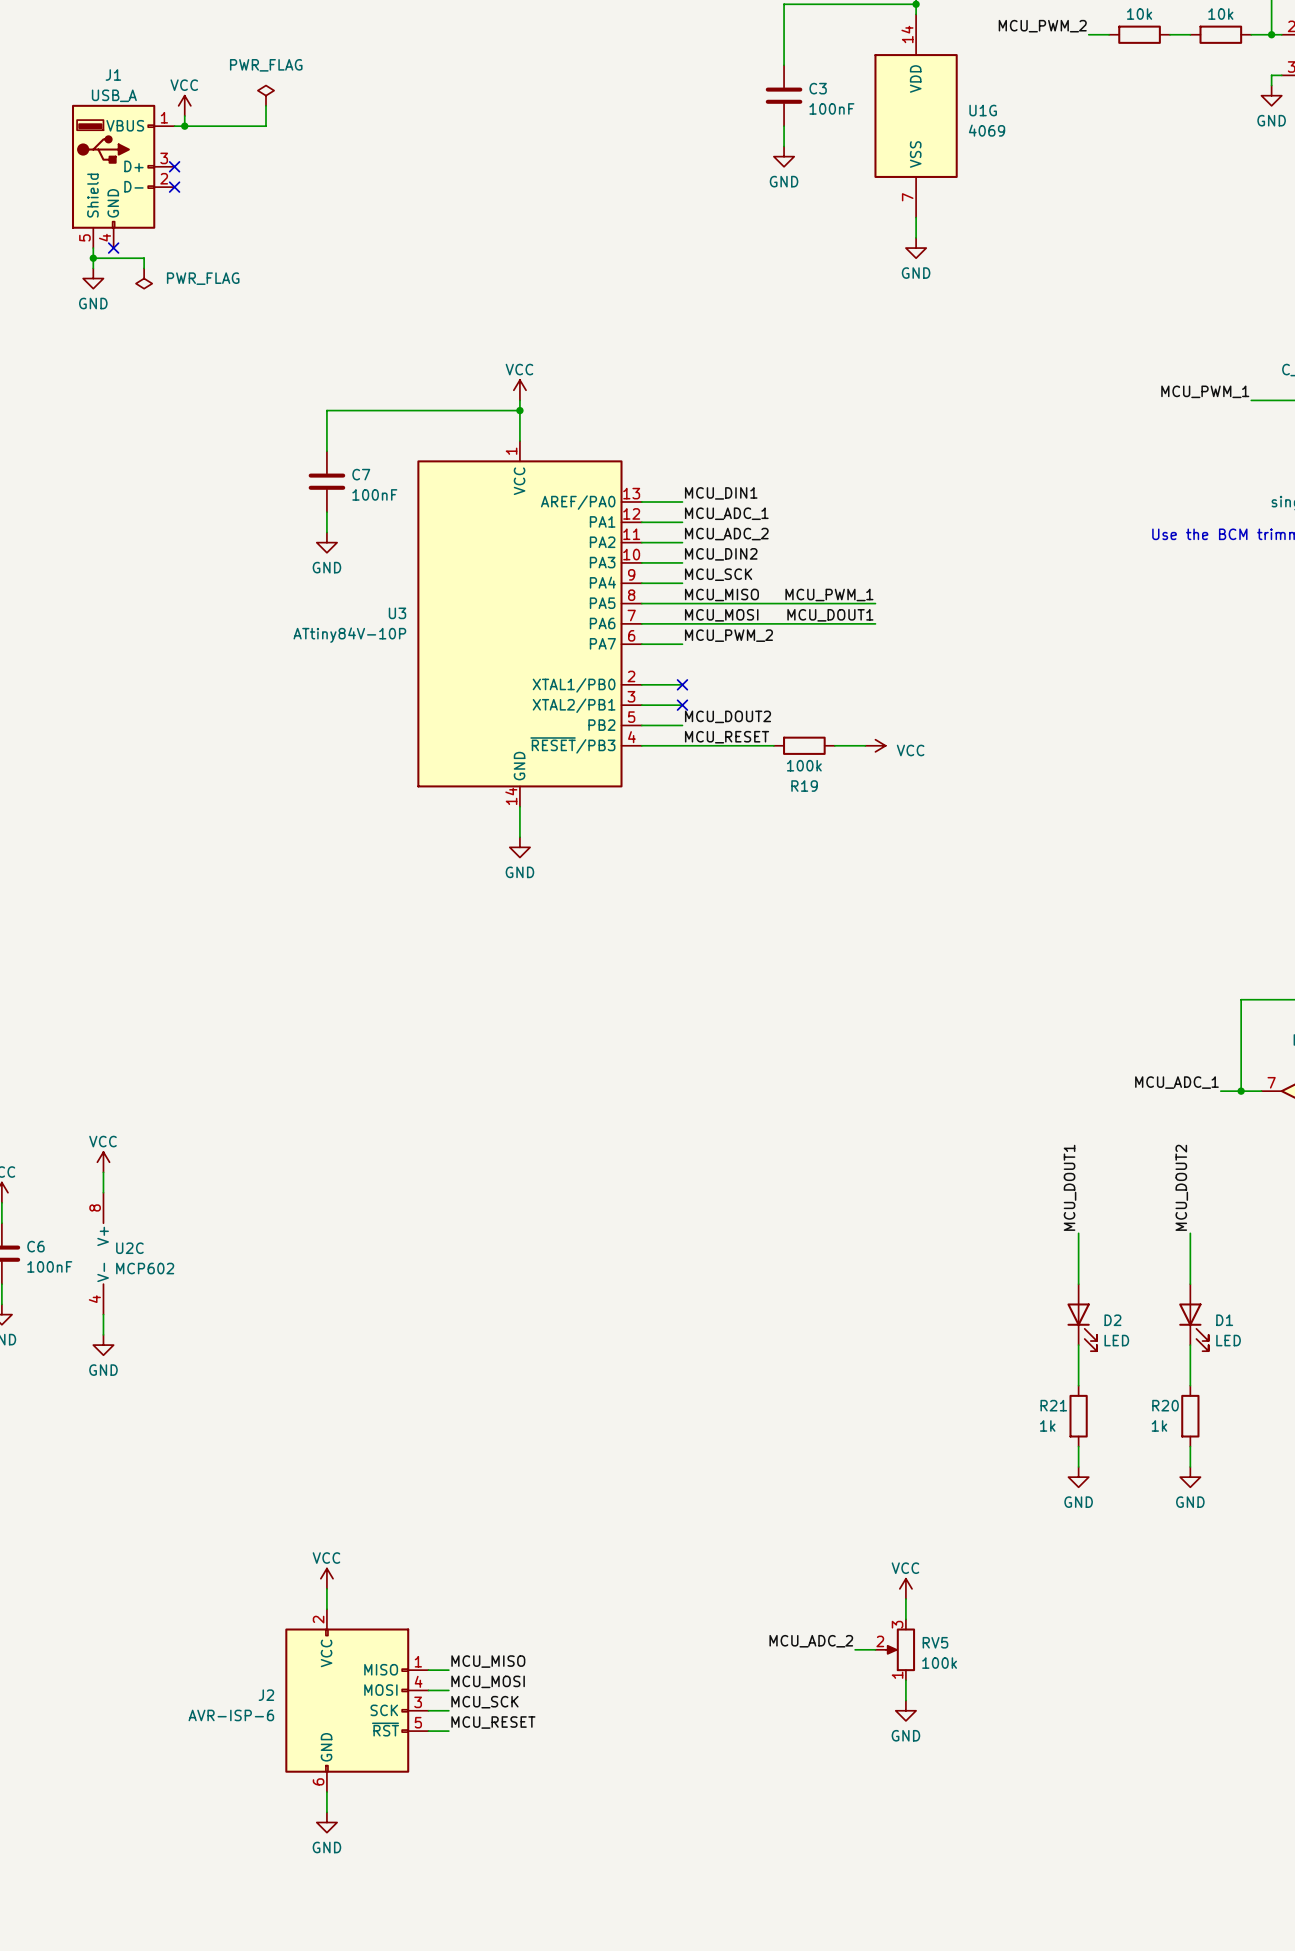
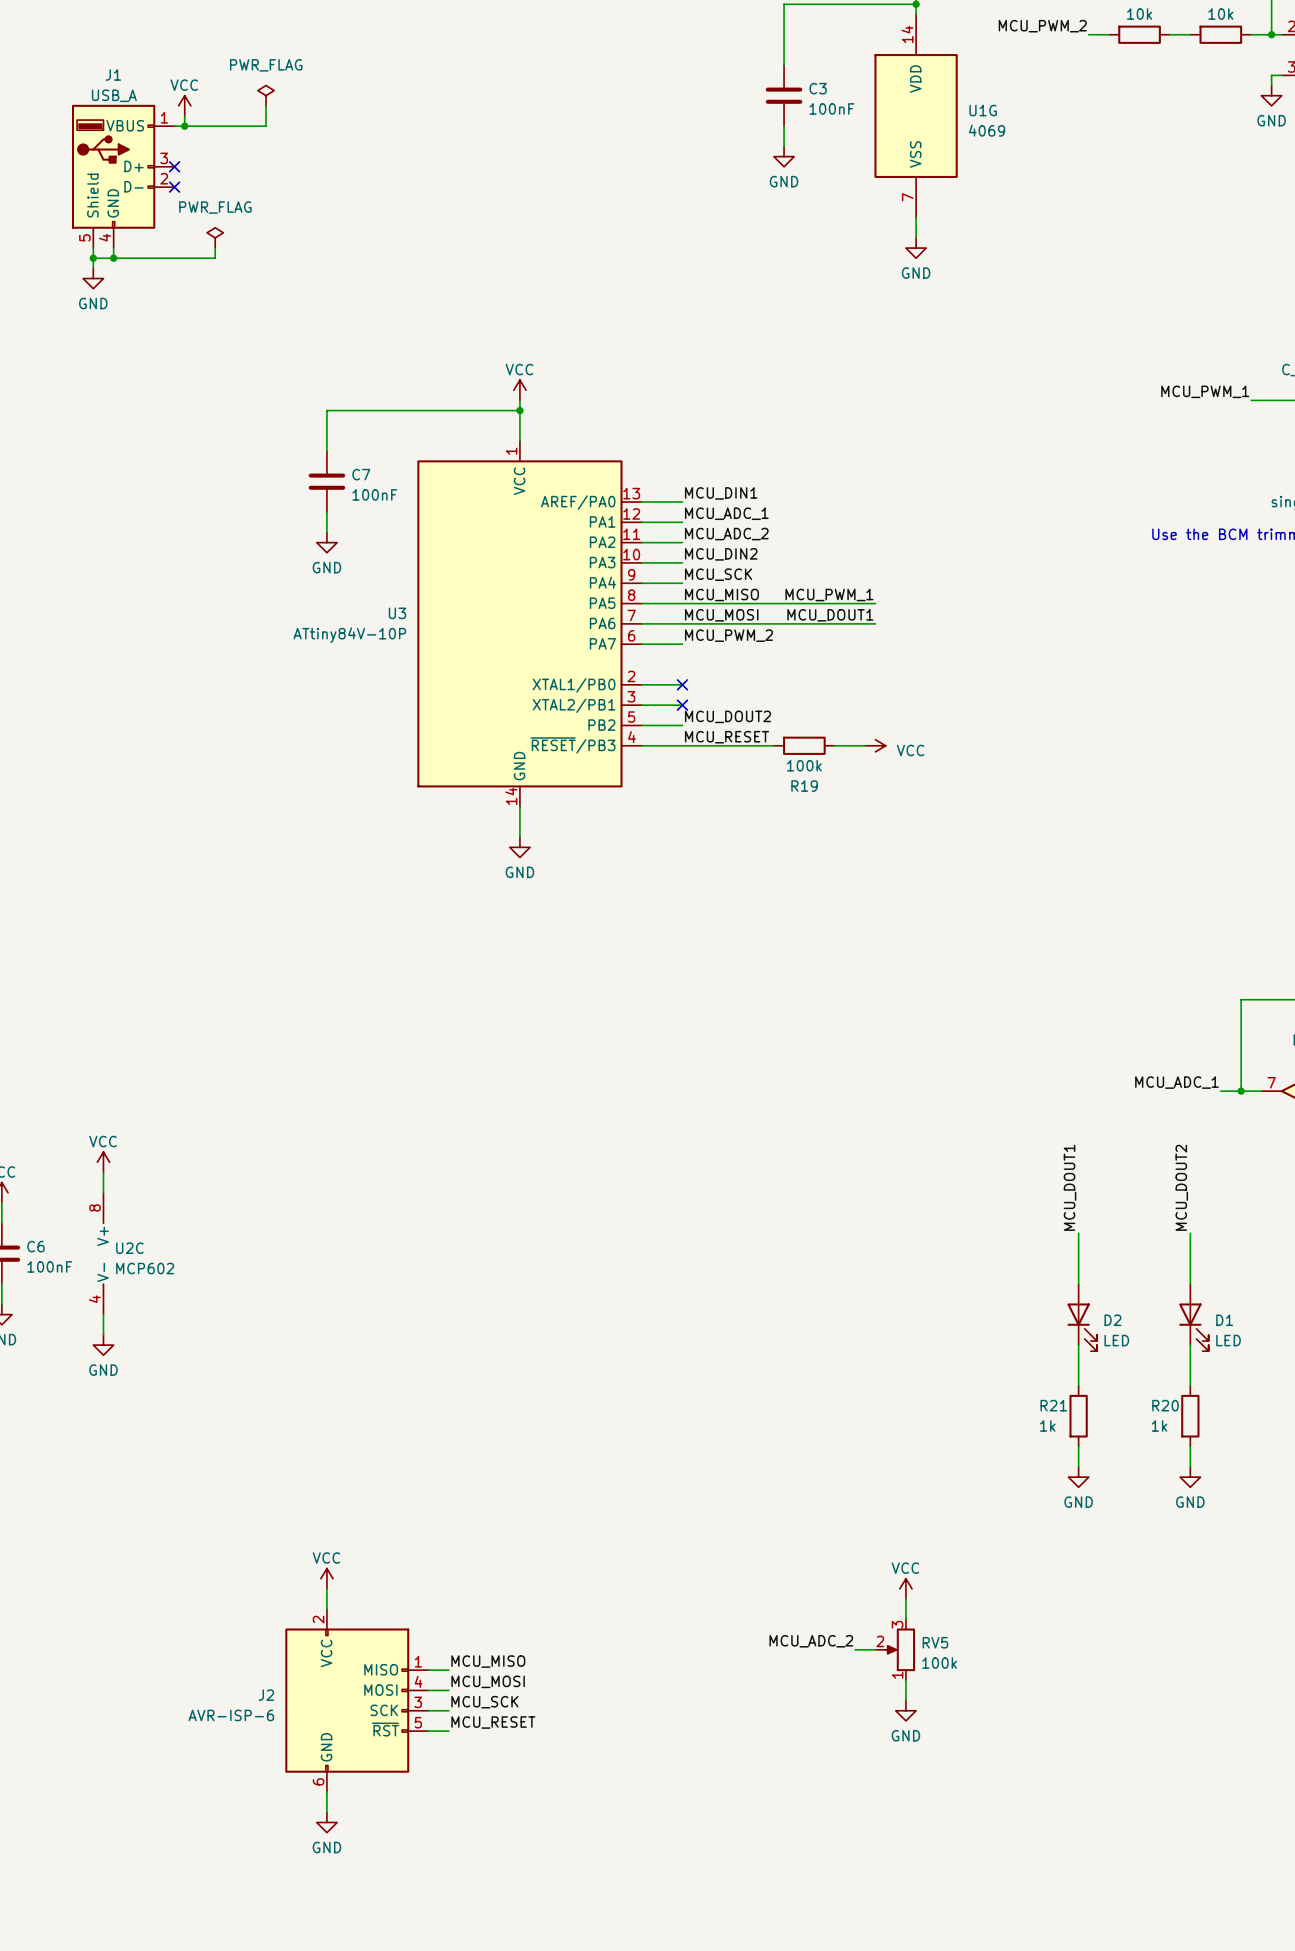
wire: none -> (113, 248) (113, 258)
no-connect mark: (113, 248) -> none
junction: none -> (113, 258)
wire: (144, 258) (144, 268) -> (144, 258) (215, 258) (215, 248)
power symbol rotation: 0° (144, 278) -> 180° (215, 237)
power symbol position: PWR_FLAG (144, 278) -> PWR_FLAG (215, 237)
power symbol text position: PWR_FLAG (203, 278) -> PWR_FLAG (215, 207)

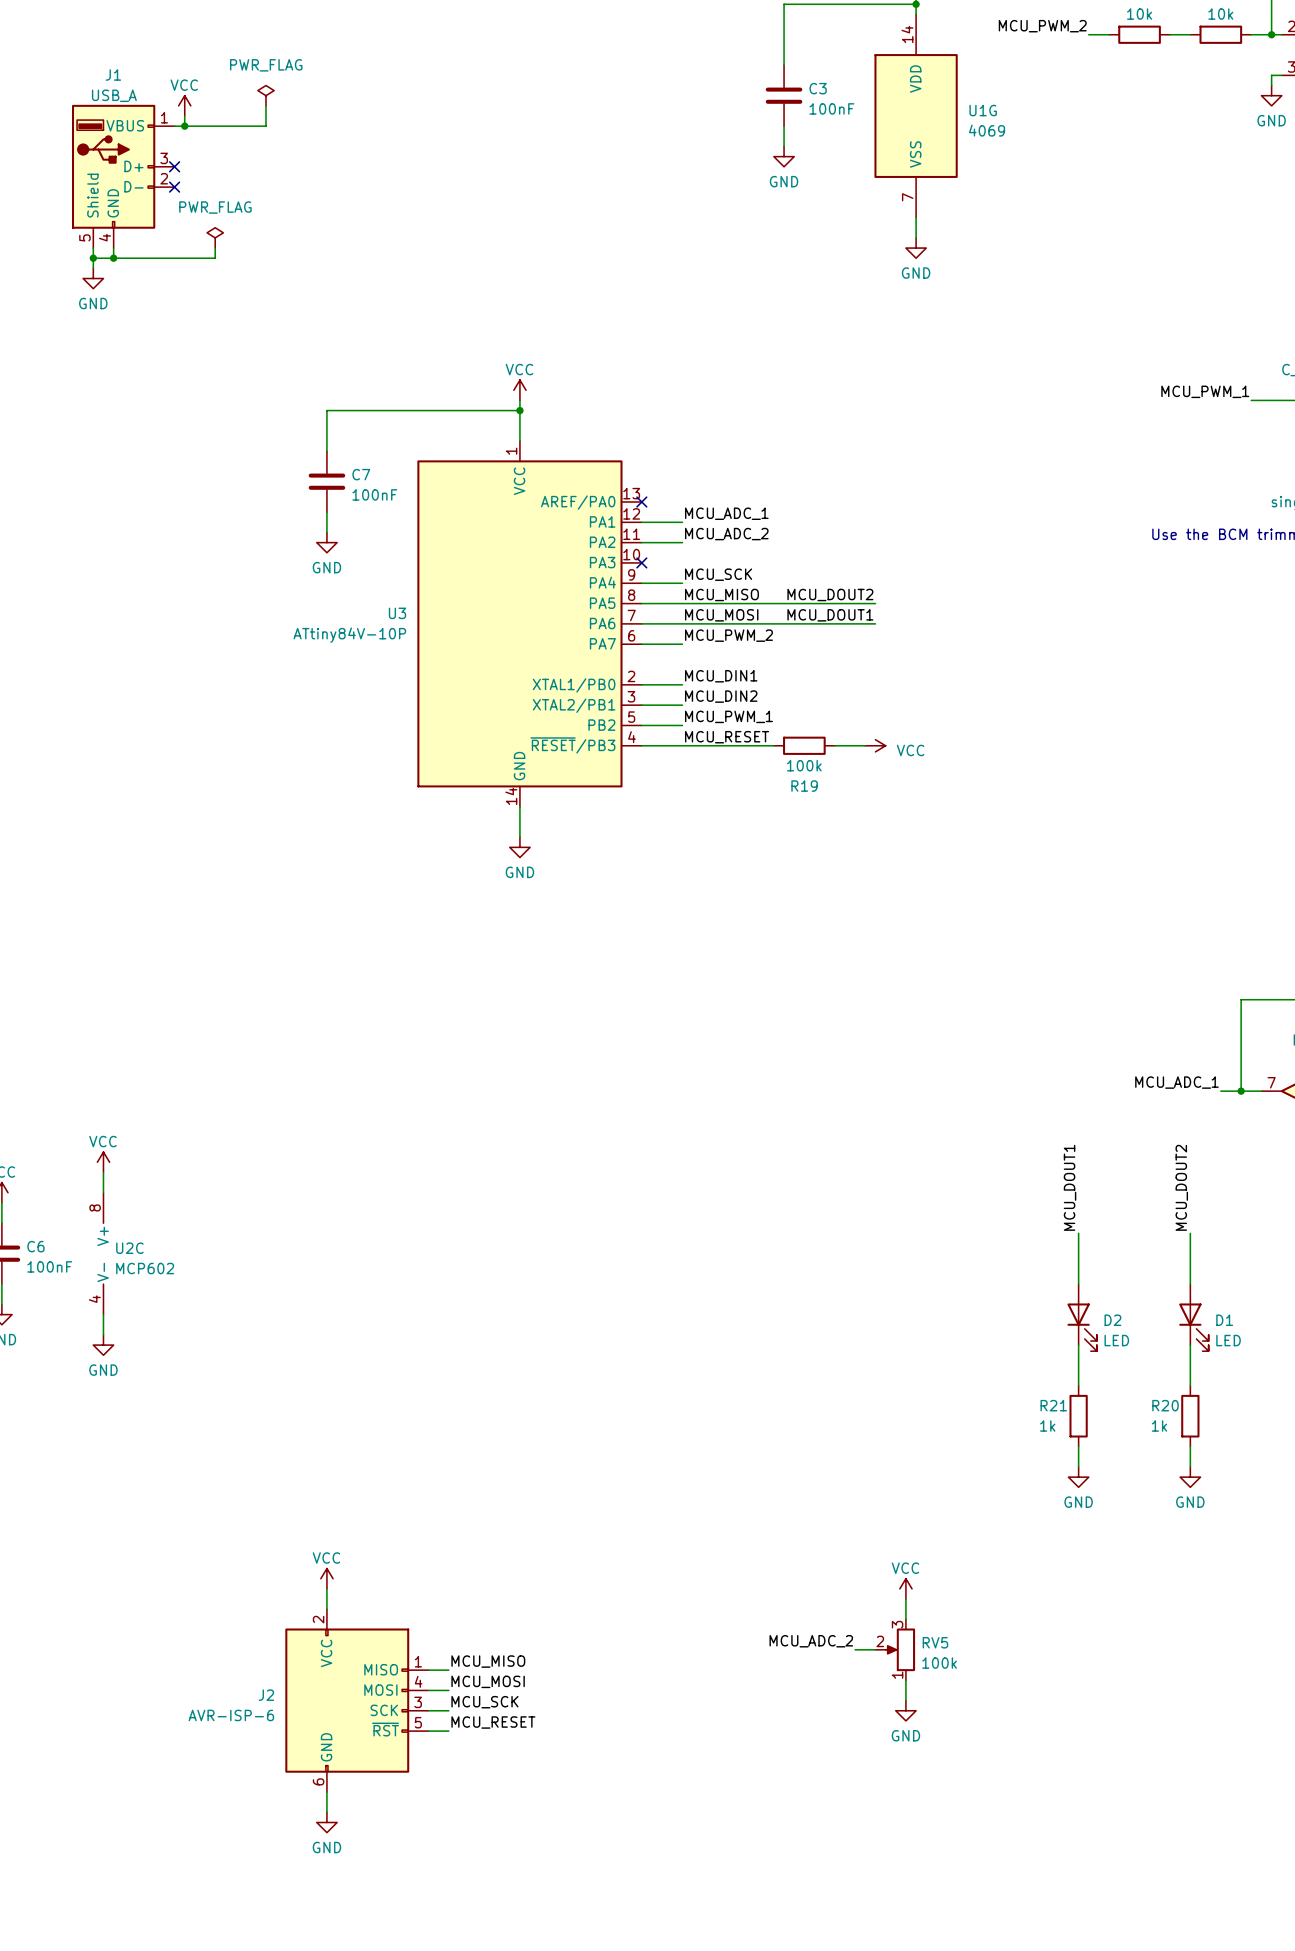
label position: MCU_DIN1 (721, 493) -> MCU_DIN1 (721, 676)
wire: (641, 502) (682, 502) -> none
no-connect mark: none -> (641, 502)
label position: MCU_DIN2 (721, 554) -> MCU_DIN2 (721, 696)
wire: (641, 562) (682, 562) -> none
no-connect mark: none -> (641, 562)
label: MCU_PWM_1 (829, 594) -> MCU_DOUT2 (830, 594)
no-connect mark: (682, 684) -> none
no-connect mark: (682, 705) -> none
label: MCU_DOUT2 (728, 716) -> MCU_PWM_1 (728, 716)

